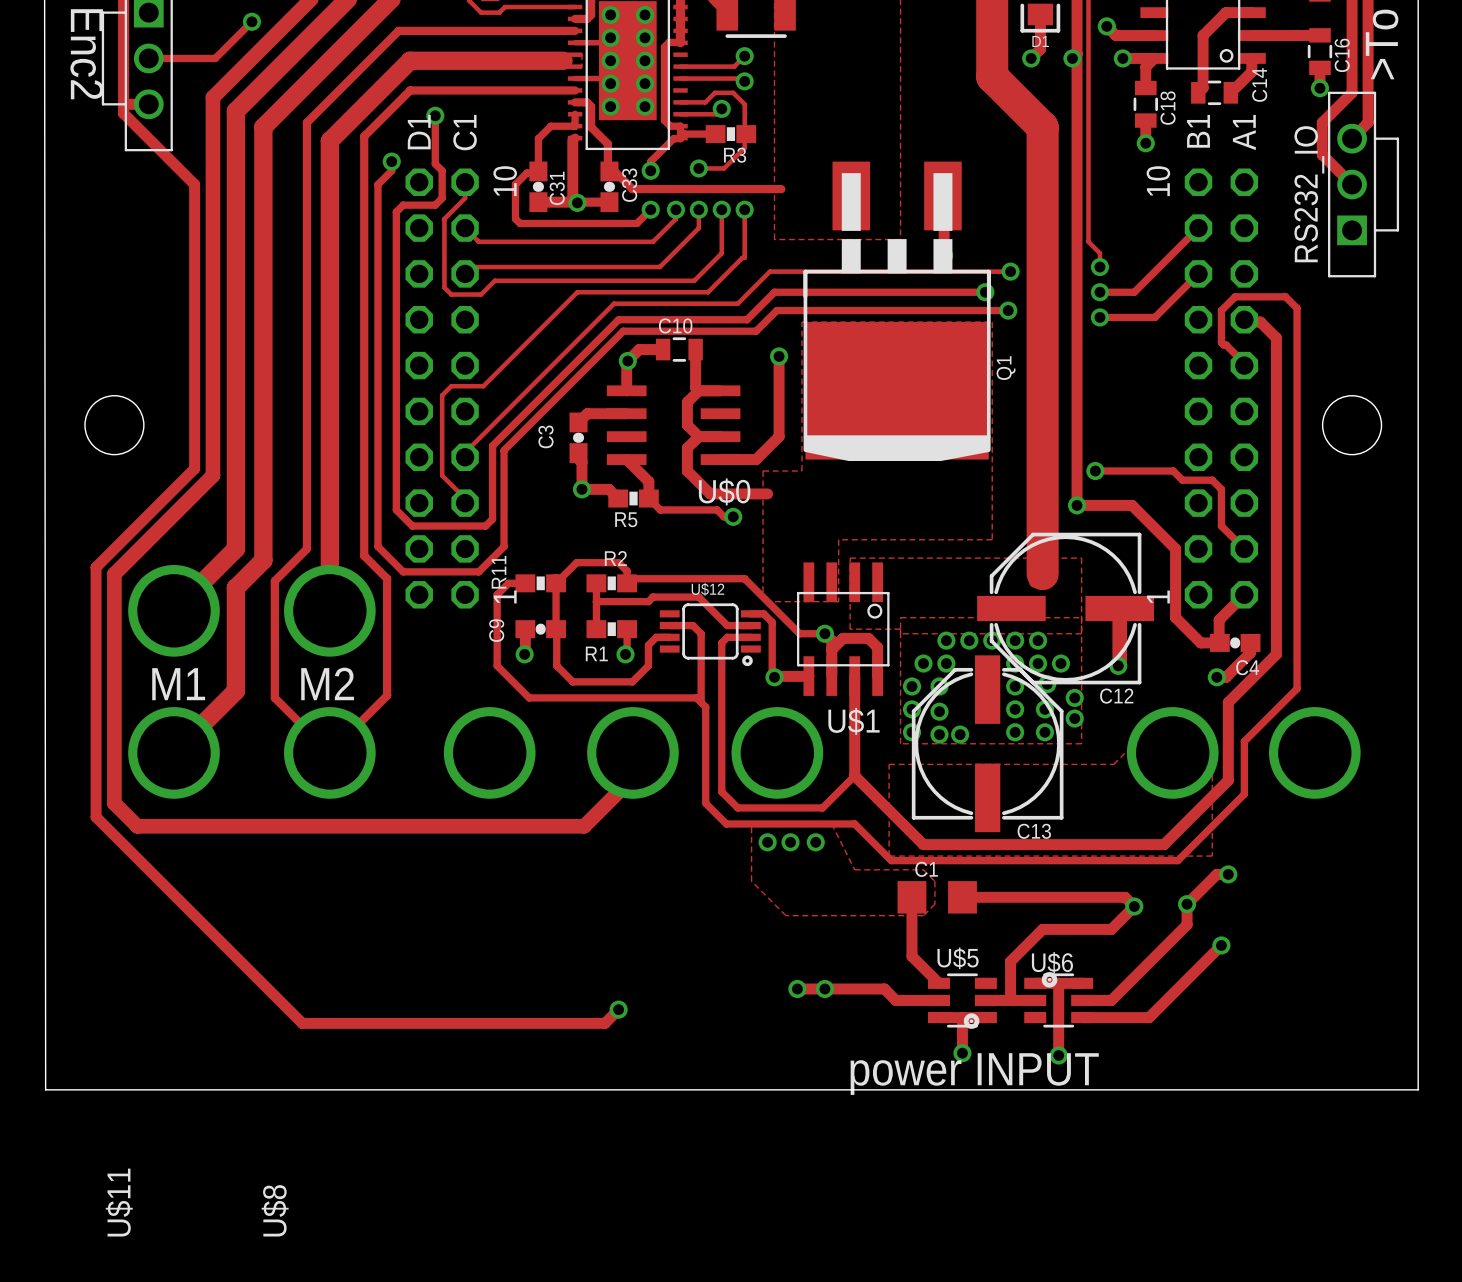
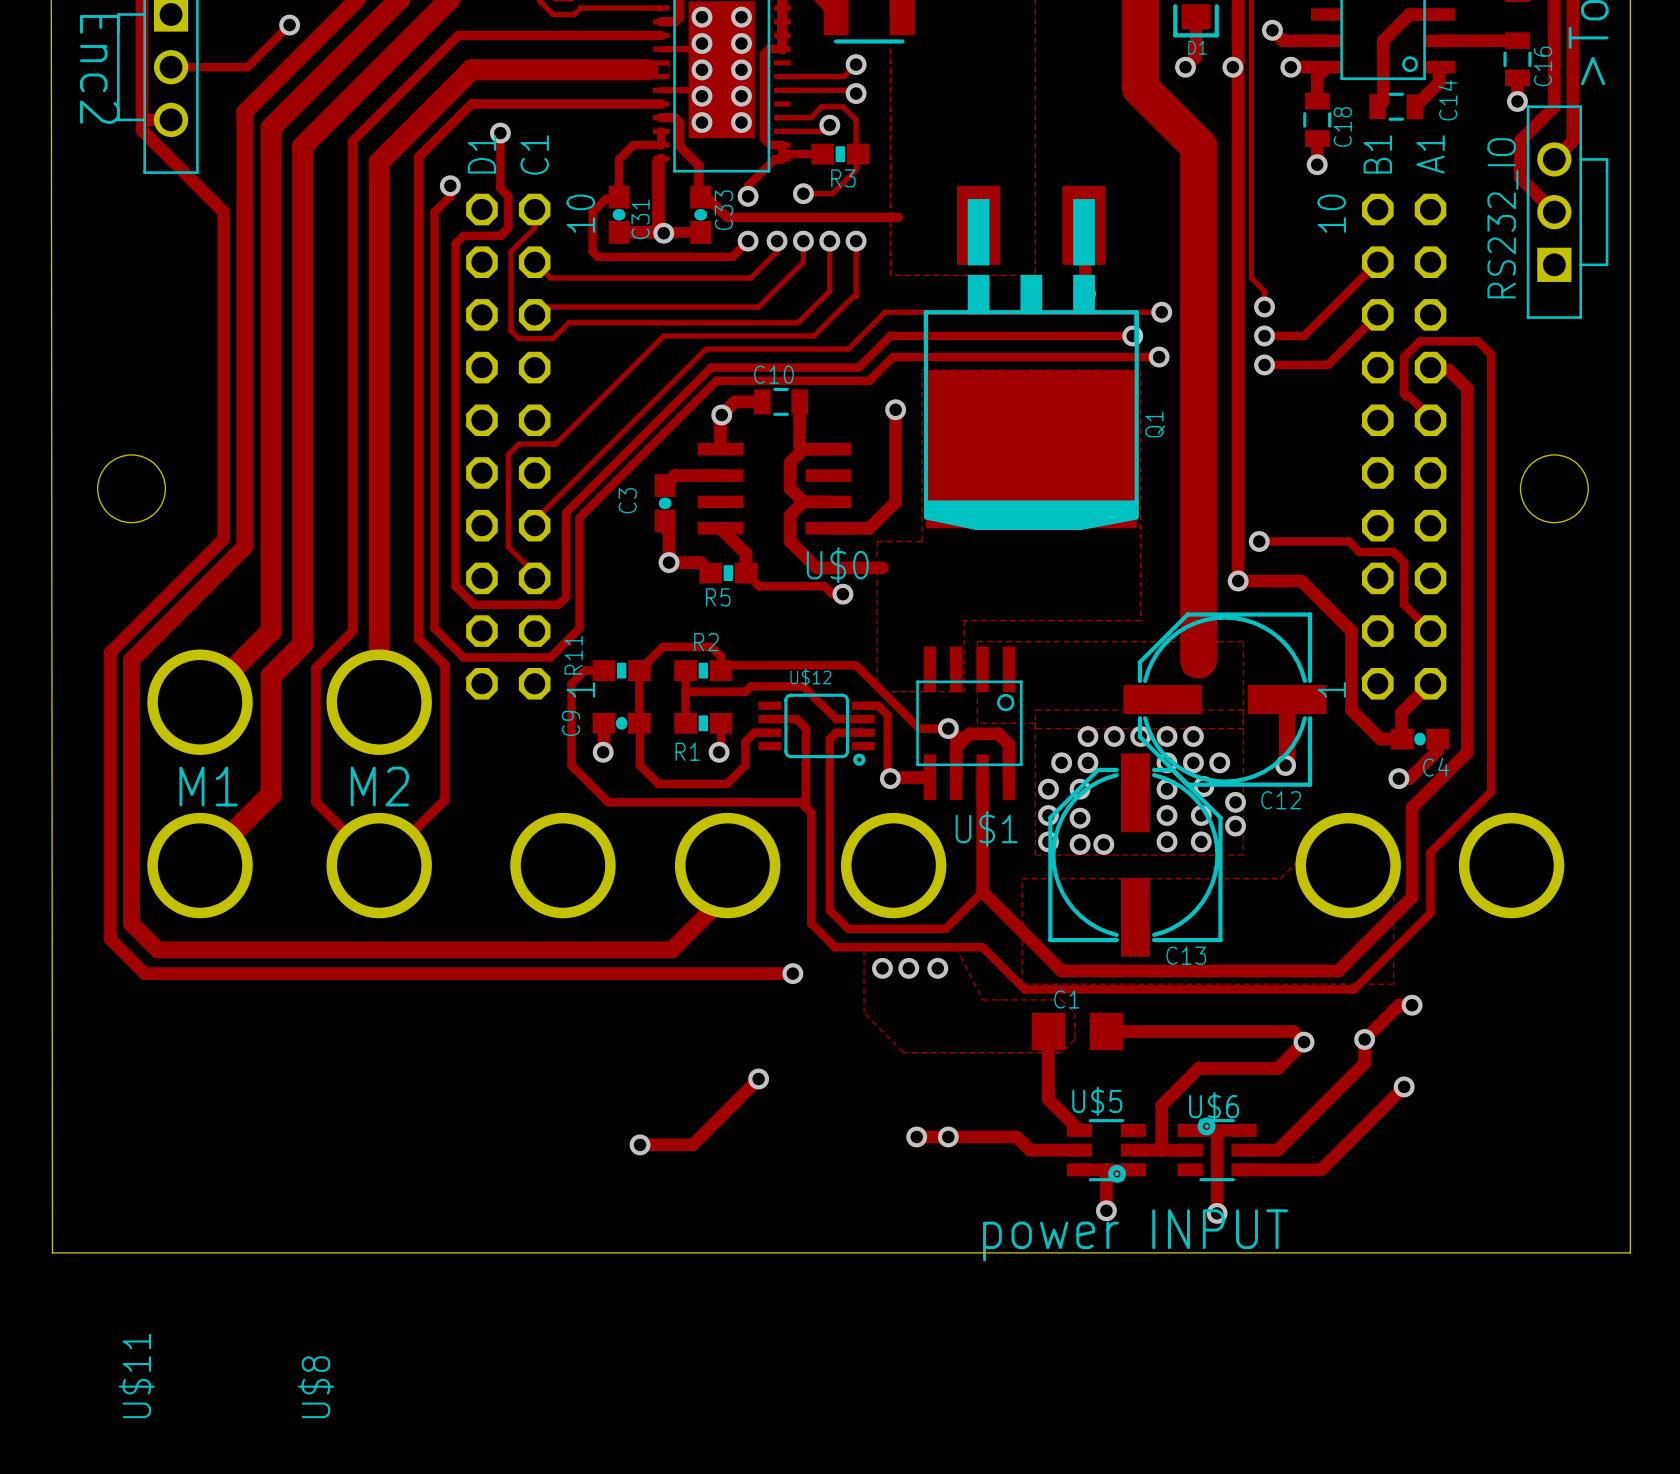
track: (125, 846) (302, 1023) (604, 1023) (618, 1009) -> (144, 973) (792, 973)
via: none -> (792, 973)
track: none -> (758, 1079) (692, 1144) (640, 1144)
via: none -> (758, 1079)
via: none -> (640, 1144)
via: (618, 1009) -> none

